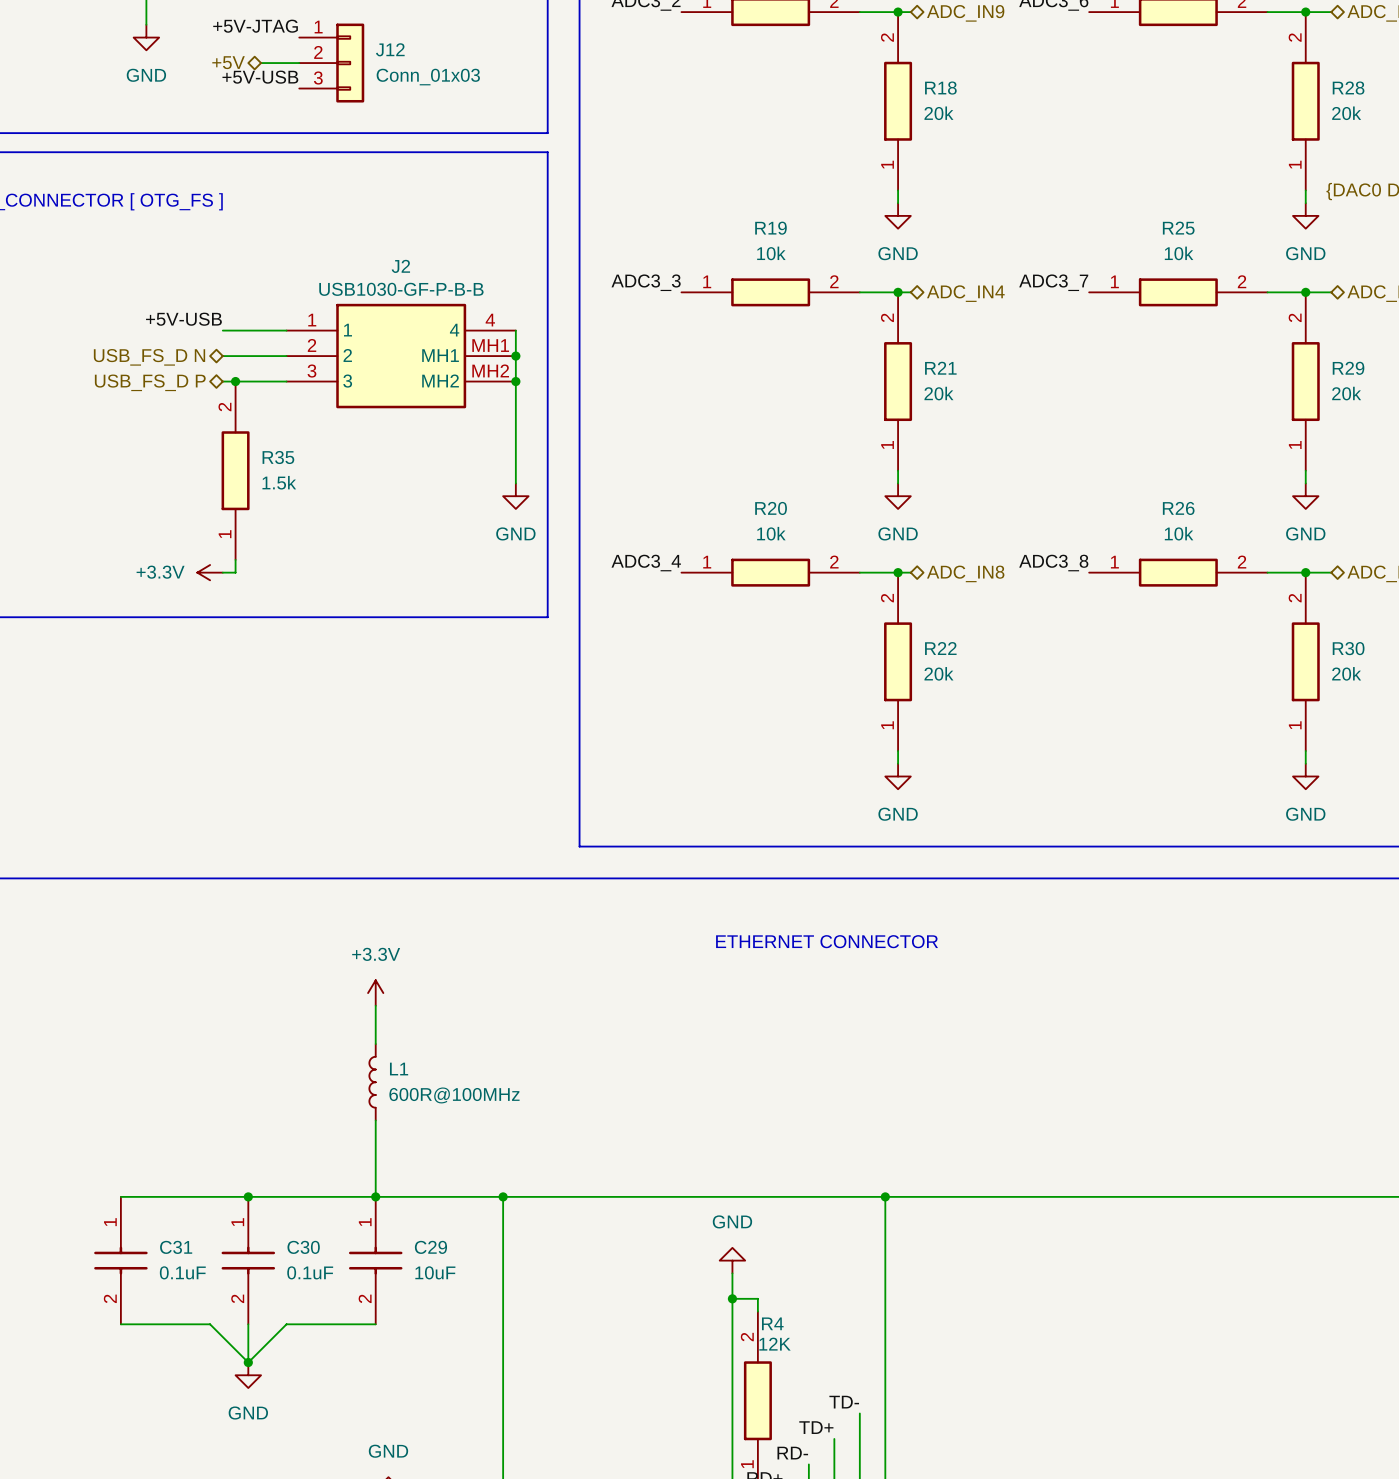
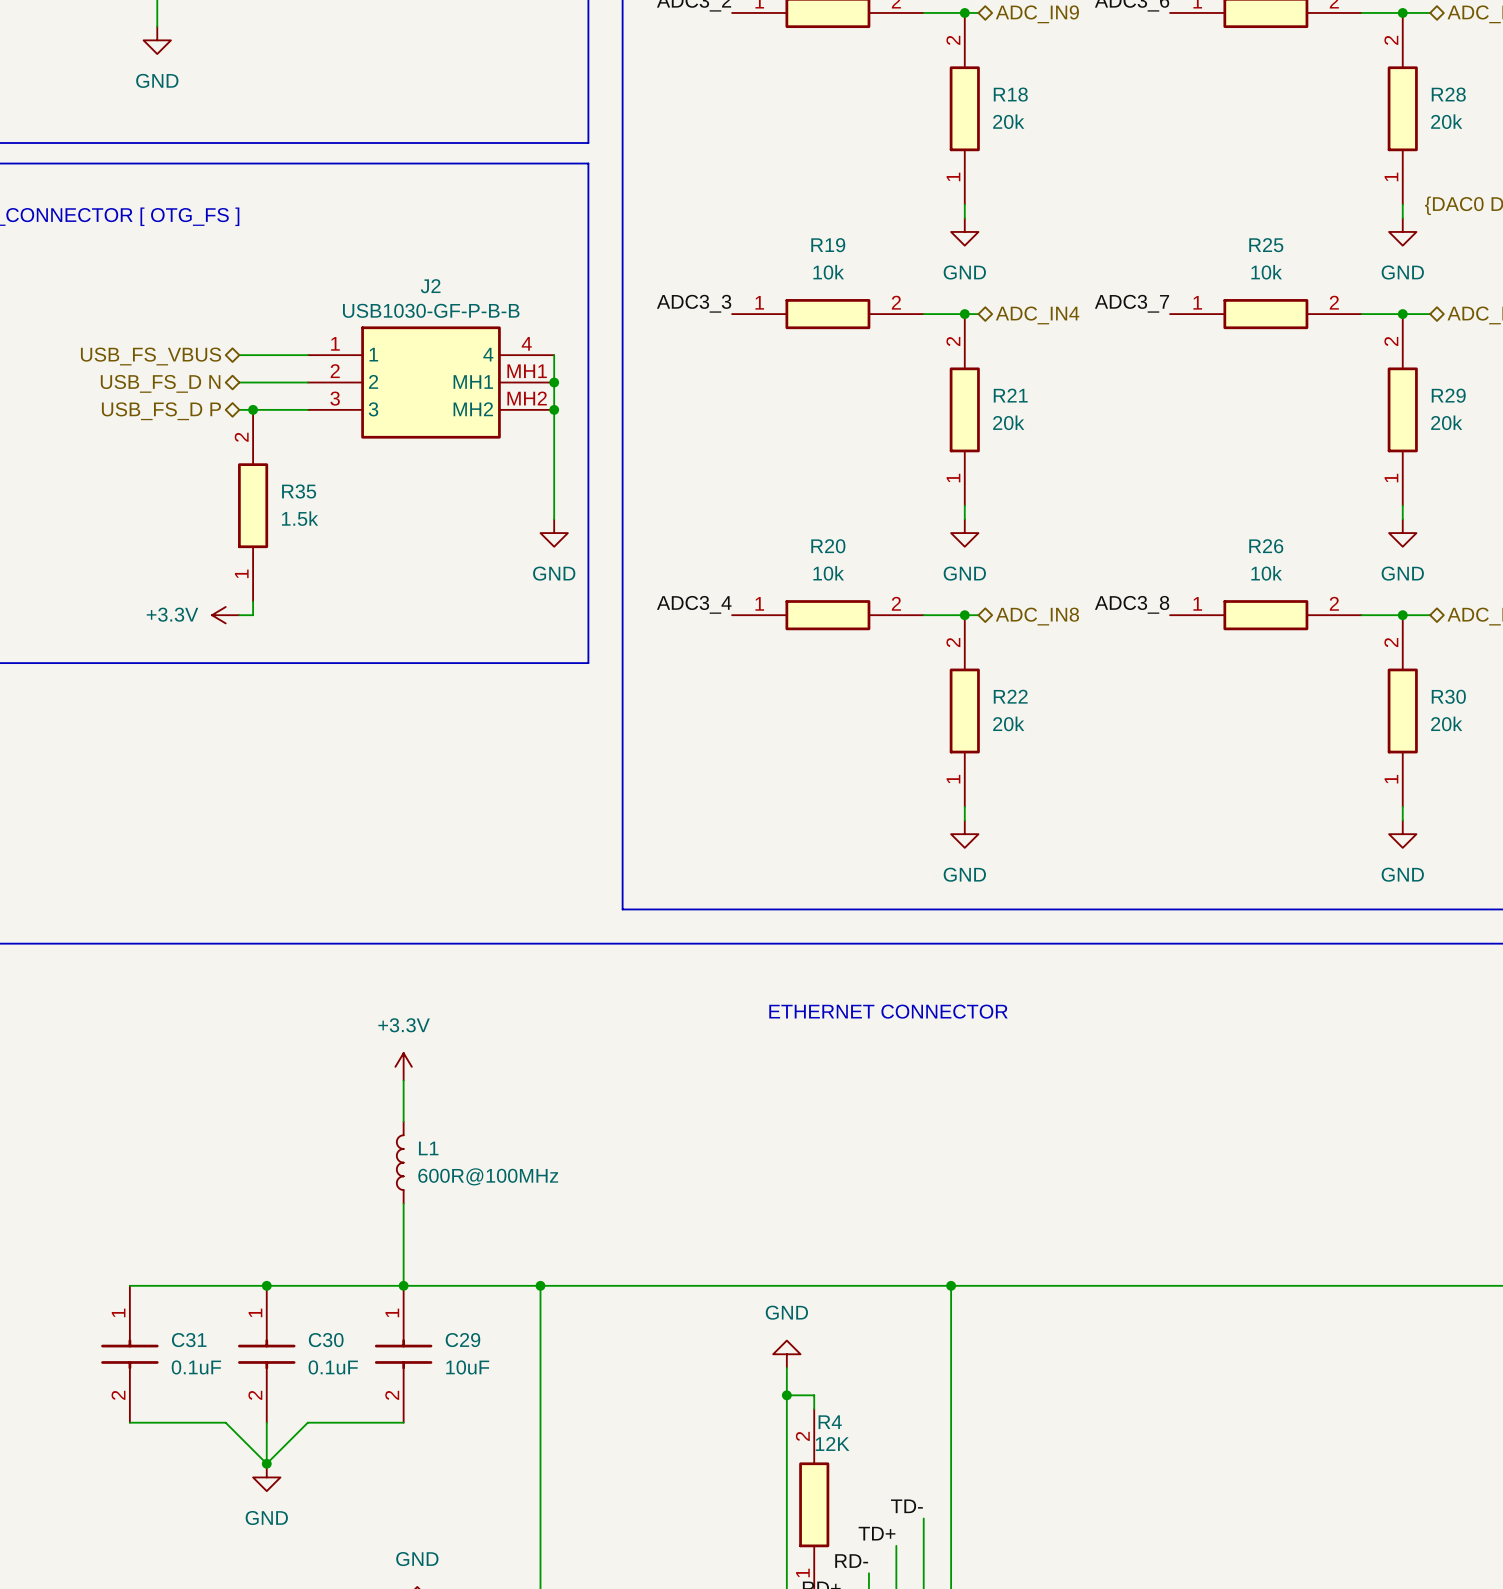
label: +5V-JTAG (255, 26) -> none
hierarchical label: +5V (228, 62) -> none
wire: (261, 63) (299, 63) -> none
J12: Conn_01x03 (331, 63) -> none
label: +5V-USB (260, 77) -> none
label: +5V-USB (183, 319) -> none
hierarchical label: none -> USB_FS_VBUS (151, 356)

